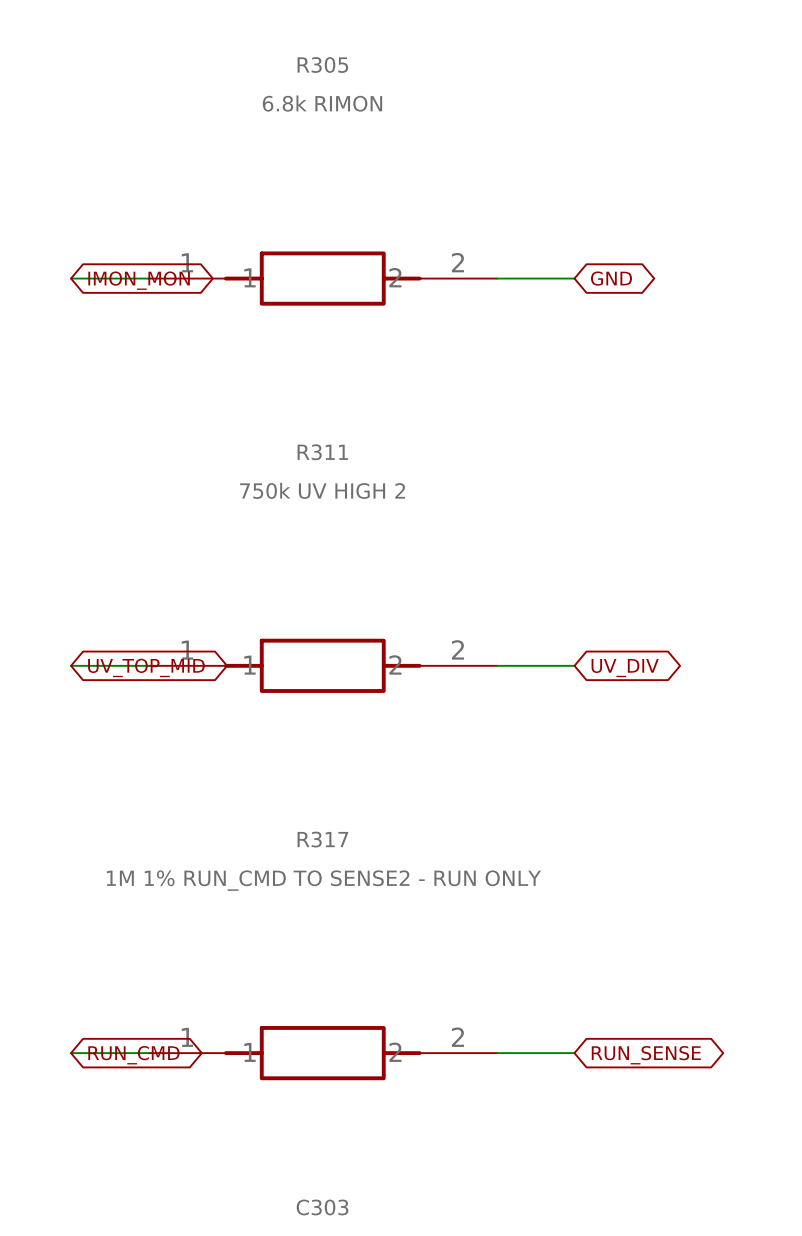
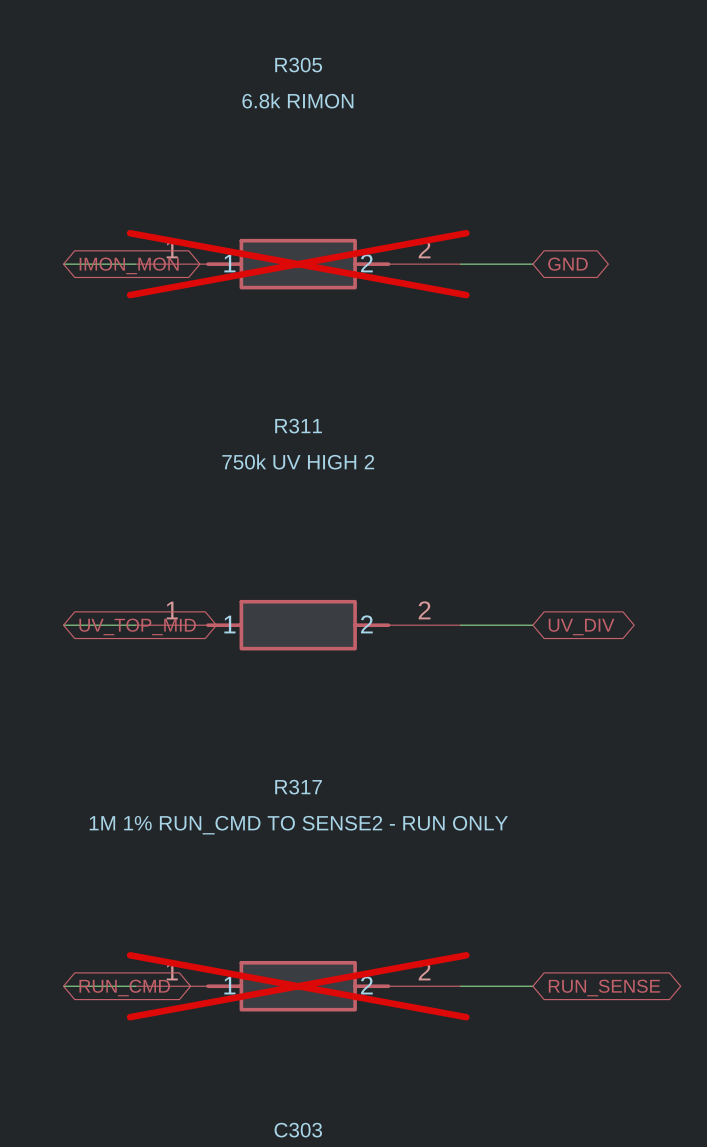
R305 do-not-place cross: none -> (298, 264)
R317 do-not-place cross: none -> (298, 986)

